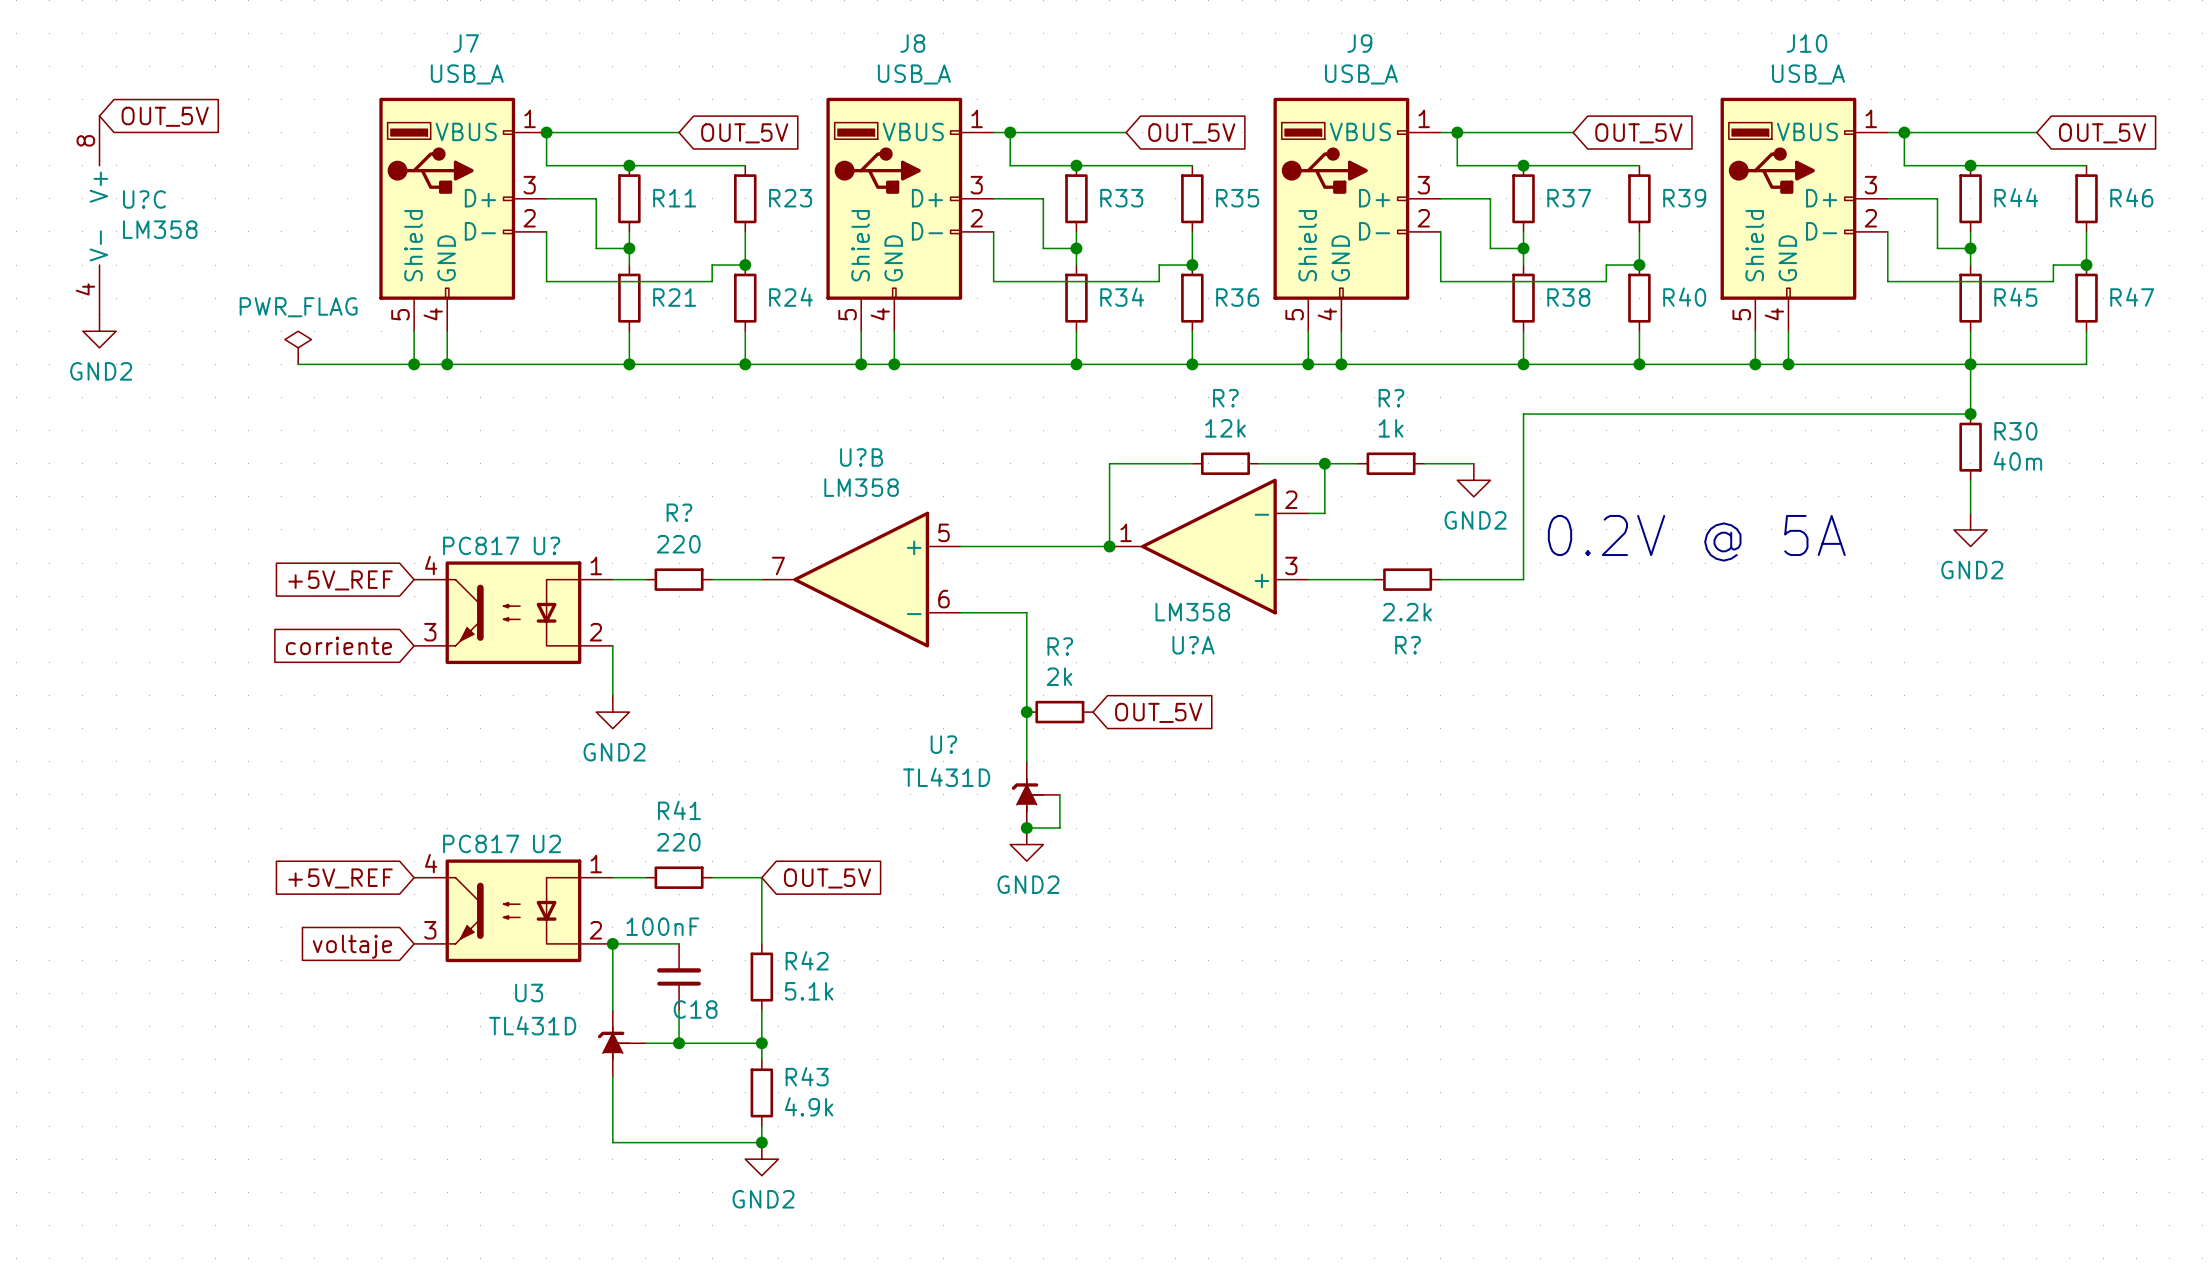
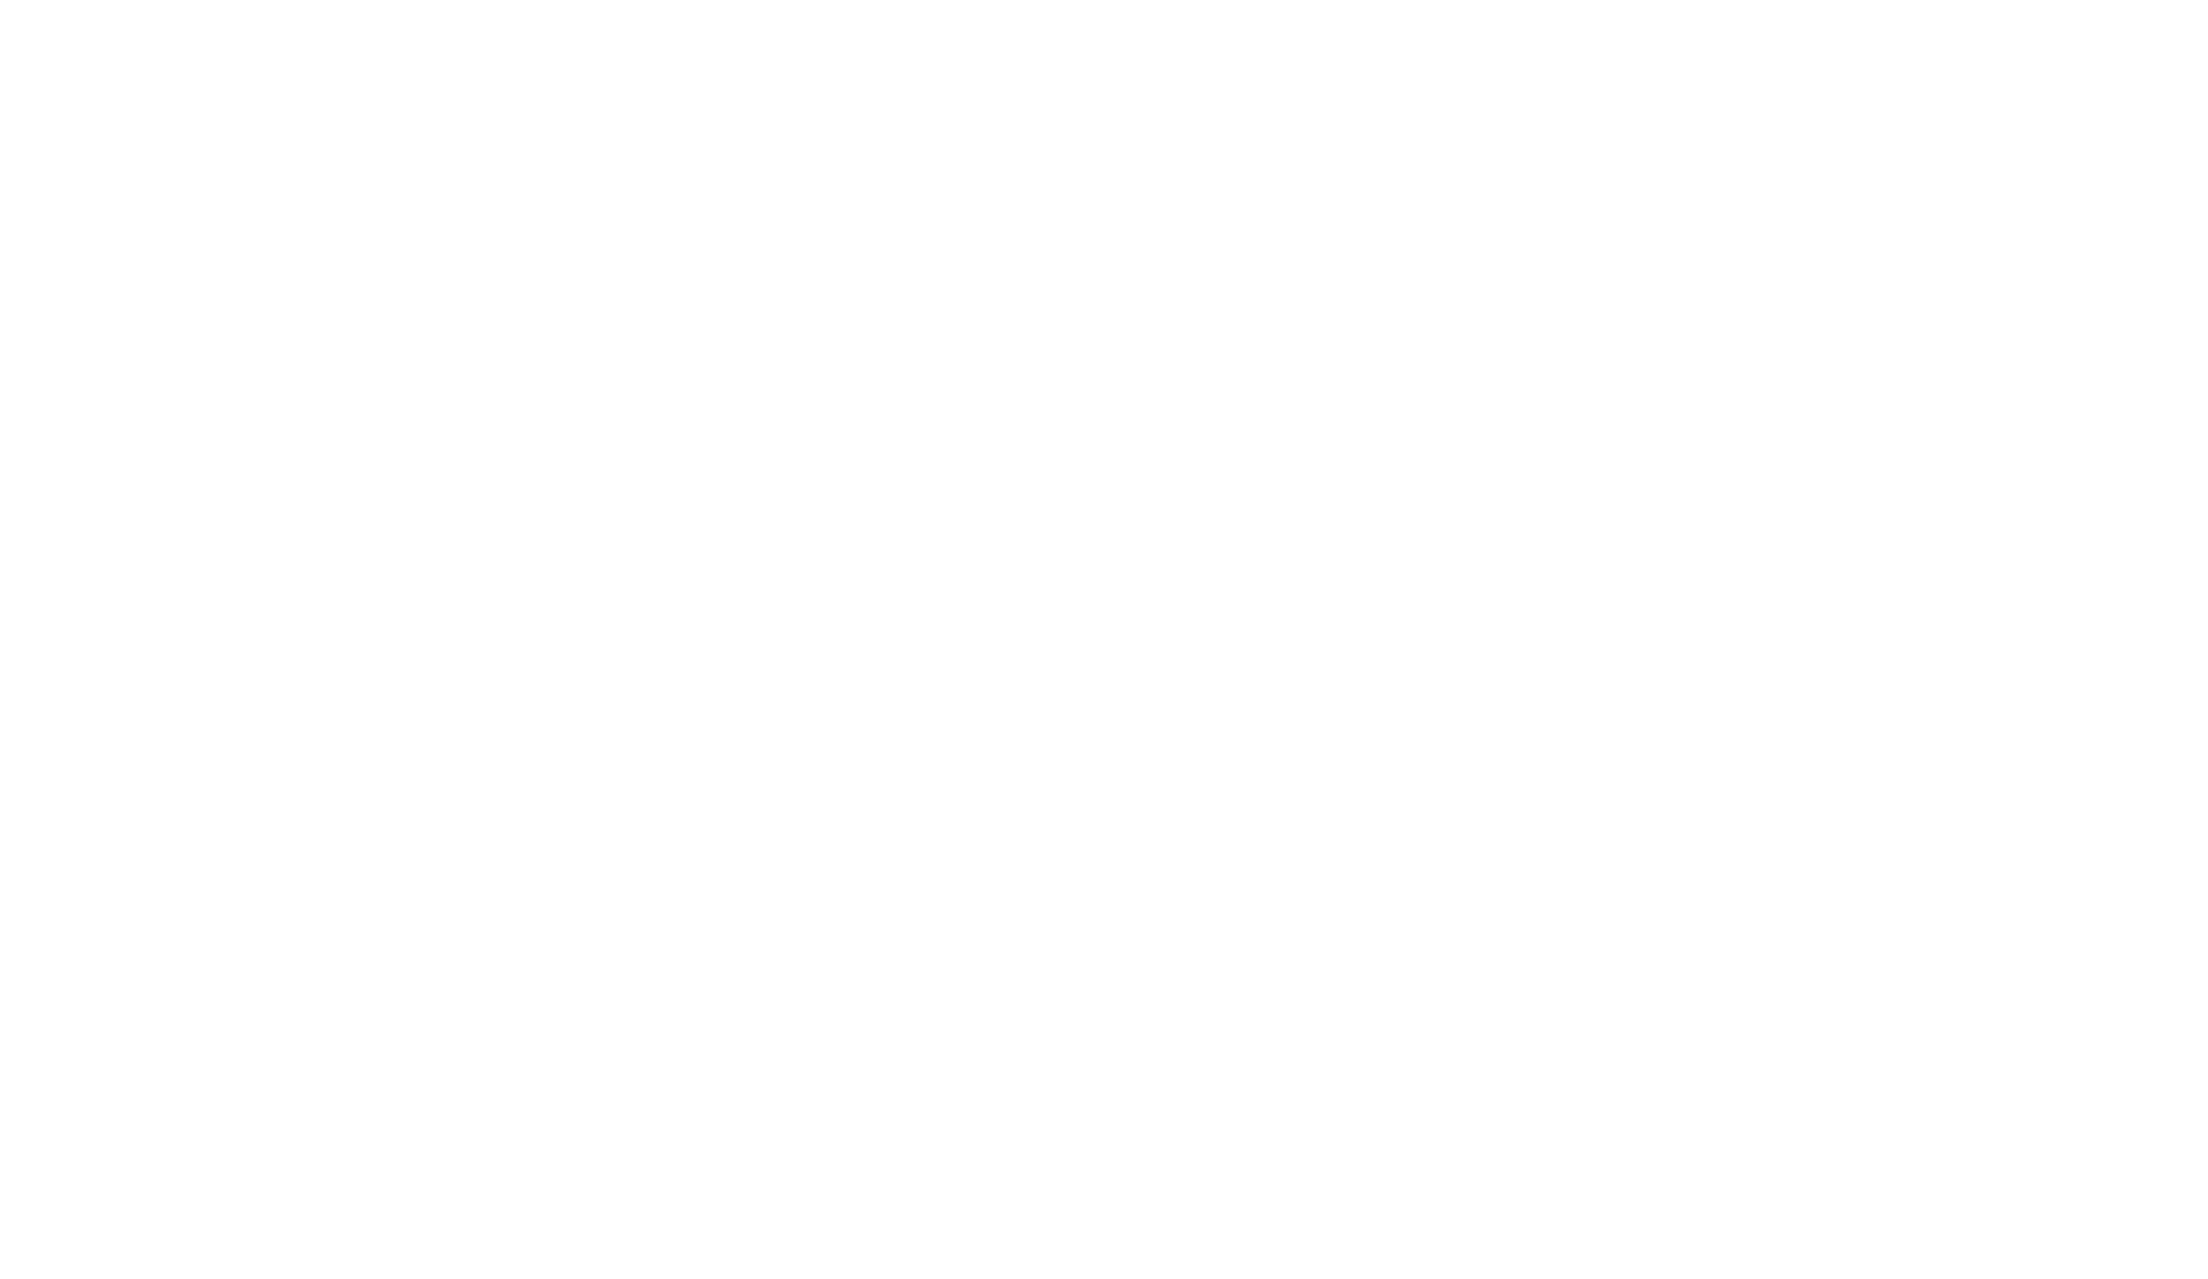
global label: OUT_5V (165, 116) -> none
junction: (546, 132) -> none
wire: (679, 132) (546, 132) (546, 165) (745, 165) -> none
wire: (993, 132) (1126, 132) -> none
wire: (1010, 132) (1010, 165) (1192, 165) -> none
junction: (1010, 132) -> none
wire: (1440, 132) (1573, 132) -> none
wire: (1457, 132) (1457, 165) (1639, 165) -> none
junction: (1457, 132) -> none
wire: (1887, 132) (2036, 132) -> none
wire: (1904, 132) (1904, 165) (2086, 165) -> none
junction: (1904, 132) -> none
global label: OUT_5V (744, 133) -> none
global label: OUT_5V (1191, 133) -> none
global label: OUT_5V (1638, 133) -> none
global label: OUT_5V (2102, 133) -> none
junction: (629, 165) -> none
junction: (1076, 165) -> none
junction: (1523, 165) -> none
junction: (1970, 165) -> none
wire: (546, 198) (596, 198) (596, 248) (629, 248) -> none
R11: (629, 198) -> none
R23: (745, 198) -> none
wire: (993, 198) (1043, 198) (1043, 248) (1076, 248) -> none
R33: (1076, 198) -> none
R35: (1192, 198) -> none
wire: (1440, 198) (1490, 198) (1490, 248) (1523, 248) -> none
R37: (1523, 198) -> none
R39: (1639, 198) -> none
wire: (1887, 198) (1937, 198) (1937, 248) (1970, 248) -> none
R44: (1970, 198) -> none
R46: (2086, 198) -> none
J7: USB_A (462, 214) -> none
J8: USB_A (910, 214) -> none
J9: USB_A (1357, 214) -> none
J10: USB_A (1804, 214) -> none
U?C: LM358 (99, 215) -> none
wire: (546, 231) (546, 281) (712, 281) (712, 265) (745, 265) (745, 231) -> none
wire: (629, 231) (629, 265) -> none
wire: (993, 231) (993, 281) (1159, 281) (1159, 265) (1192, 265) (1192, 231) -> none
wire: (1076, 231) (1076, 265) -> none
wire: (1440, 231) (1440, 281) (1606, 281) (1606, 265) (1639, 265) (1639, 231) -> none
wire: (1523, 231) (1523, 265) -> none
wire: (1887, 231) (1887, 281) (2053, 281) (2053, 265) (2086, 265) (2086, 231) -> none
wire: (1970, 231) (1970, 265) -> none
junction: (629, 248) -> none
junction: (1076, 248) -> none
junction: (1523, 248) -> none
junction: (1970, 248) -> none
junction: (745, 265) -> none
junction: (1192, 265) -> none
junction: (1639, 265) -> none
junction: (2086, 265) -> none
R21: (629, 298) -> none
R24: (745, 298) -> none
R34: (1076, 298) -> none
R36: (1192, 298) -> none
R38: (1523, 298) -> none
R40: (1639, 298) -> none
R45: (1970, 298) -> none
R47: (2086, 298) -> none
power symbol: GND2 (99, 331) -> none
wire: (414, 331) (414, 364) -> none
wire: (447, 331) (447, 364) -> none
wire: (629, 331) (629, 364) -> none
wire: (745, 331) (745, 364) -> none
wire: (861, 331) (861, 364) -> none
wire: (894, 331) (894, 364) -> none
wire: (1076, 331) (1076, 364) -> none
wire: (1192, 331) (1192, 364) -> none
wire: (1308, 331) (1308, 364) -> none
wire: (1341, 331) (1341, 364) -> none
wire: (1523, 331) (1523, 364) -> none
wire: (1639, 331) (1639, 364) -> none
wire: (1755, 331) (1755, 364) -> none
wire: (1788, 331) (1788, 364) -> none
wire: (1970, 331) (1970, 414) (1523, 414) (1523, 579) (1440, 579) -> none
wire: (2086, 331) (2086, 364) (298, 364) -> none
power symbol: PWR_FLAG (298, 347) -> none
junction: (414, 364) -> none
junction: (447, 364) -> none
junction: (629, 364) -> none
junction: (745, 364) -> none
junction: (861, 364) -> none
junction: (894, 364) -> none
junction: (1076, 364) -> none
junction: (1192, 364) -> none
junction: (1308, 364) -> none
junction: (1341, 364) -> none
junction: (1523, 364) -> none
junction: (1639, 364) -> none
junction: (1755, 364) -> none
junction: (1788, 364) -> none
junction: (1970, 364) -> none
junction: (1970, 414) -> none
R30: 40m (1970, 447) -> none
wire: (1192, 463) (1109, 463) (1109, 546) (960, 546) -> none
R?: 12k (1225, 463) -> none
wire: (1258, 463) (1357, 463) -> none
wire: (1324, 463) (1324, 513) (1308, 513) -> none
junction: (1324, 463) -> none
R?: 1k (1391, 463) -> none
wire: (1424, 463) (1473, 463) -> none
power symbol: GND2 (1473, 480) -> none
wire: (1970, 480) (1970, 513) -> none
power symbol: GND2 (1970, 529) -> none
text: 0.2V @ 5A (1696, 538) -> none
junction: (1109, 546) -> none
U?A: LM358 (1208, 546) -> none
wire: (612, 579) (645, 579) -> none
R?: 220 (679, 579) -> none
wire: (712, 579) (761, 579) -> none
U?B: LM358 (861, 579) -> none
wire: (1308, 579) (1374, 579) -> none
R?: 2.2k (1407, 579) -> none
global label: +5V_REF (340, 580) -> none
U?: PC817 (513, 612) -> none
wire: (960, 612) (1026, 612) (1026, 761) -> none
global label: corriente (338, 645) -> none
wire: (612, 645) (612, 695) -> none
power symbol: GND2 (612, 712) -> none
junction: (1026, 712) -> none
R?: 2k (1059, 712) -> none
global label: OUT_5V (1158, 712) -> none
U?: TL431D (1035, 794) -> none
wire: (1059, 794) (1059, 828) (1026, 828) -> none
junction: (1026, 828) -> none
power symbol: GND2 (1026, 844) -> none
wire: (612, 877) (645, 877) -> none
R41: 220 (679, 877) -> none
wire: (712, 877) (761, 877) (761, 943) -> none
global label: +5V_REF (340, 878) -> none
global label: OUT_5V (827, 878) -> none
U2: PC817 (513, 910) -> none
junction: (612, 943) -> none
wire: (679, 943) (612, 943) (612, 1010) -> none
global label: voltaje (352, 946) -> none
C18: 100nF (679, 977) -> none
R42: 5.1k (761, 977) -> none
wire: (679, 1010) (679, 1043) -> none
wire: (761, 1010) (761, 1059) -> none
U3: TL431D (621, 1043) -> none
wire: (645, 1043) (761, 1043) -> none
junction: (679, 1043) -> none
junction: (761, 1043) -> none
wire: (612, 1076) (612, 1142) (761, 1142) (761, 1126) -> none
R43: 4.9k (761, 1092) -> none
junction: (761, 1142) -> none
power symbol: GND2 (761, 1159) -> none

